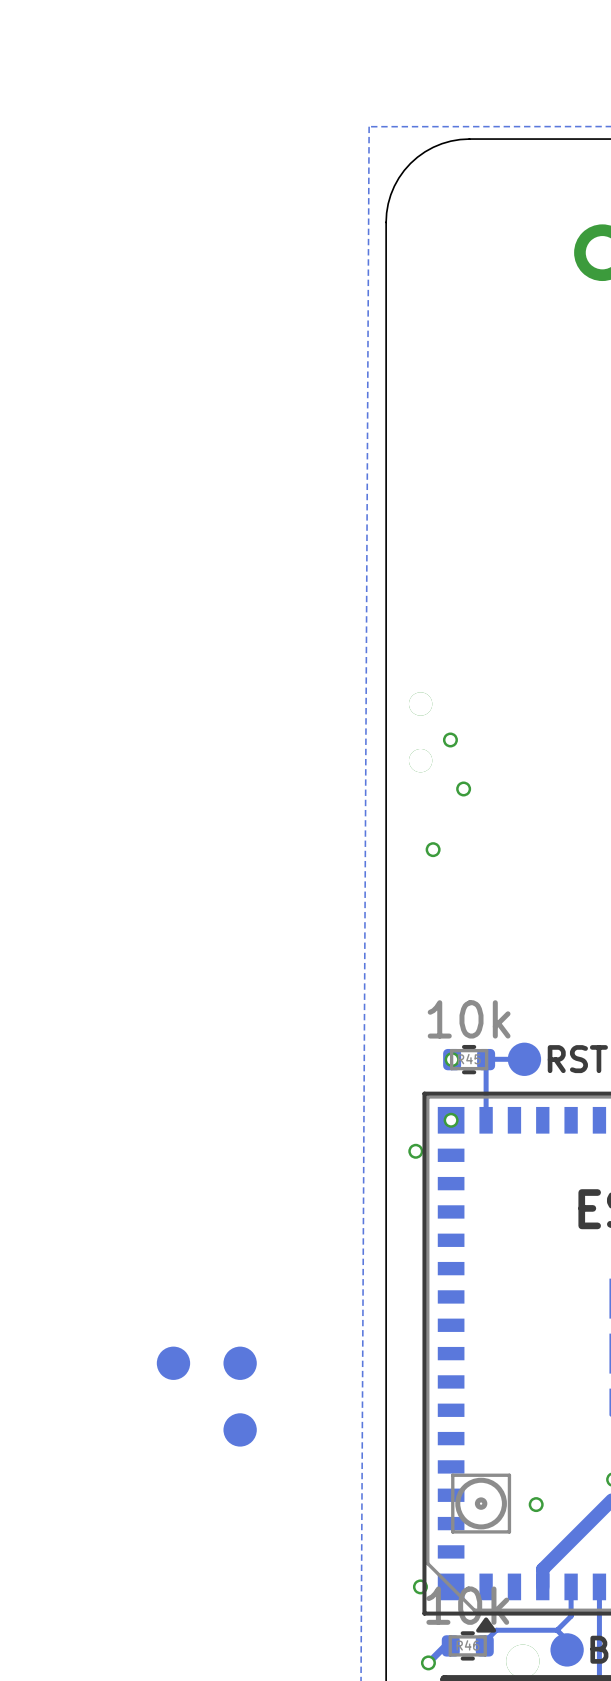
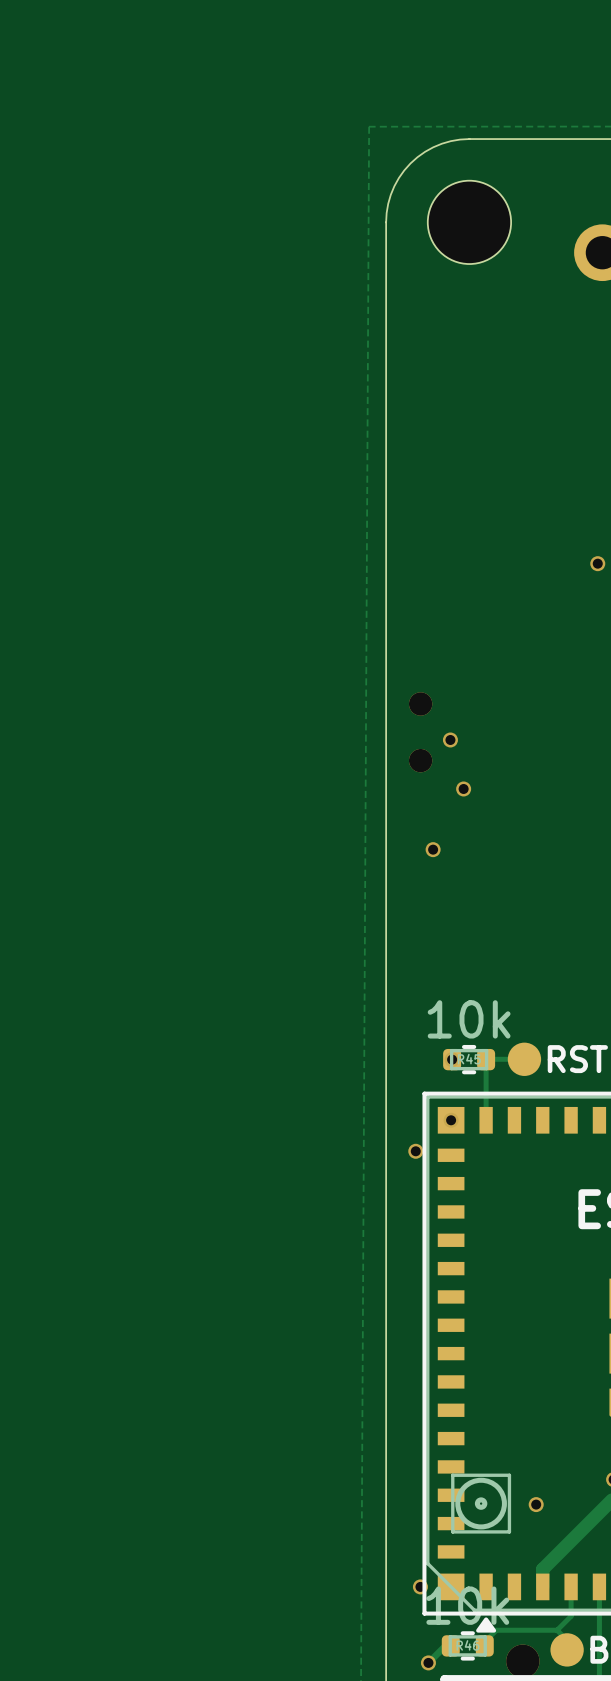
part: none -> (469, 222)
via: none -> (597, 563)
part: (173, 1363) -> none
part: (240, 1363) -> none
part: (240, 1429) -> none

